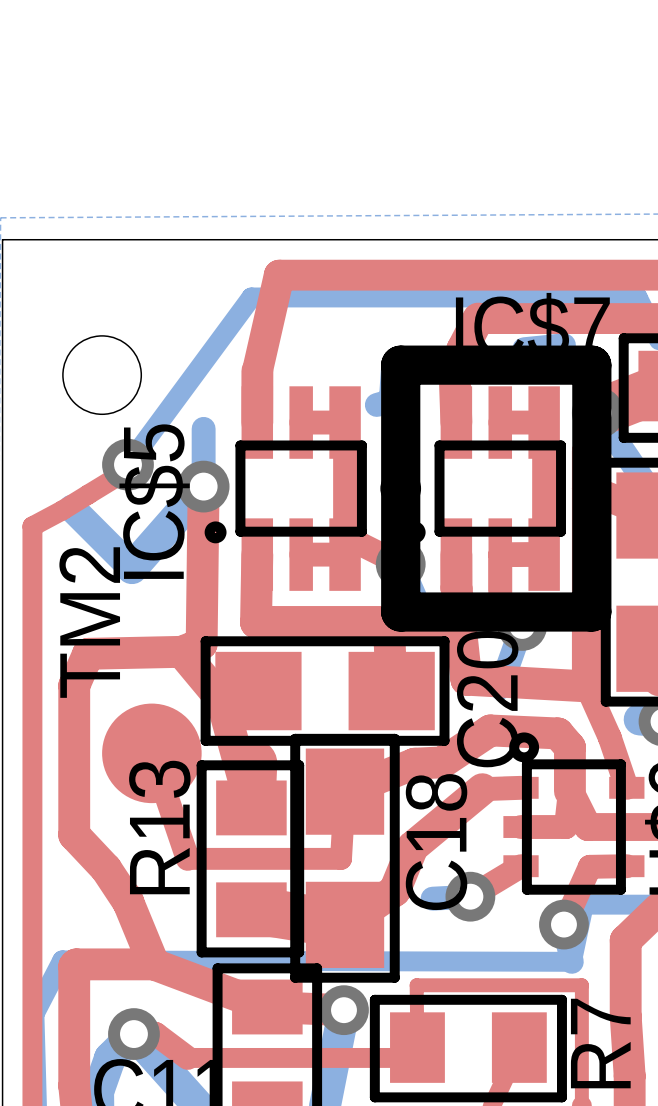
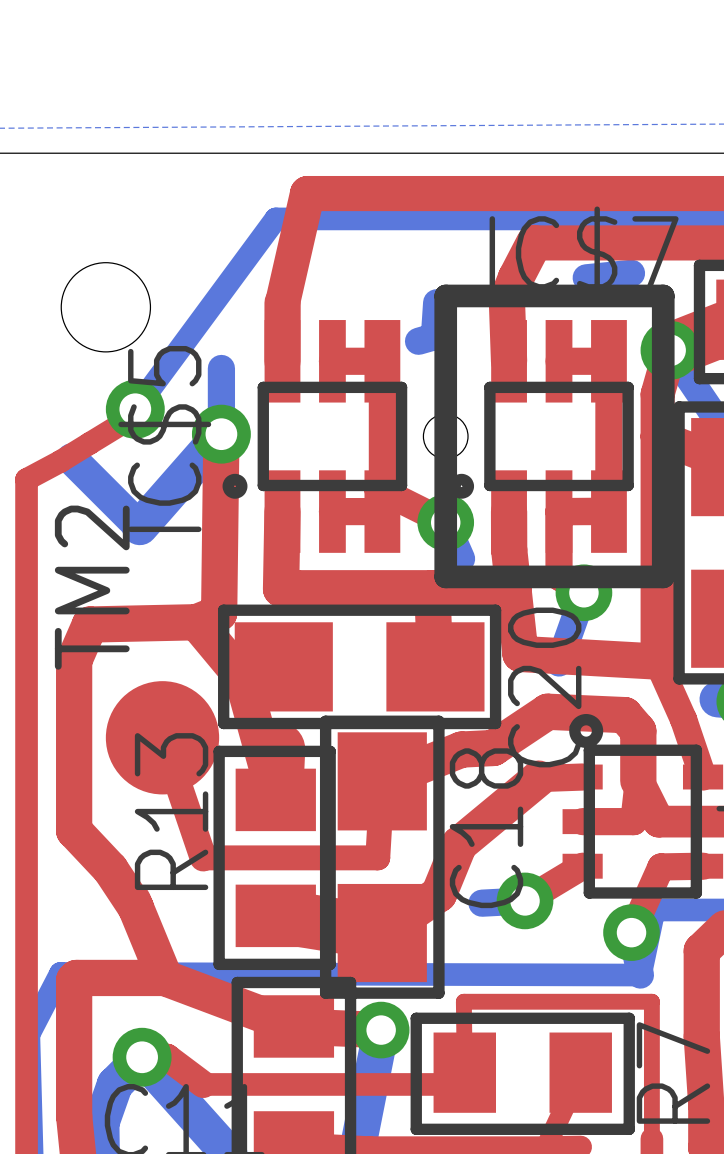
line width: thick (400, 365) (591, 365) (591, 612) (400, 612) (400, 365) -> thin (445, 295) (663, 295) (663, 576) (445, 576) (445, 295)

